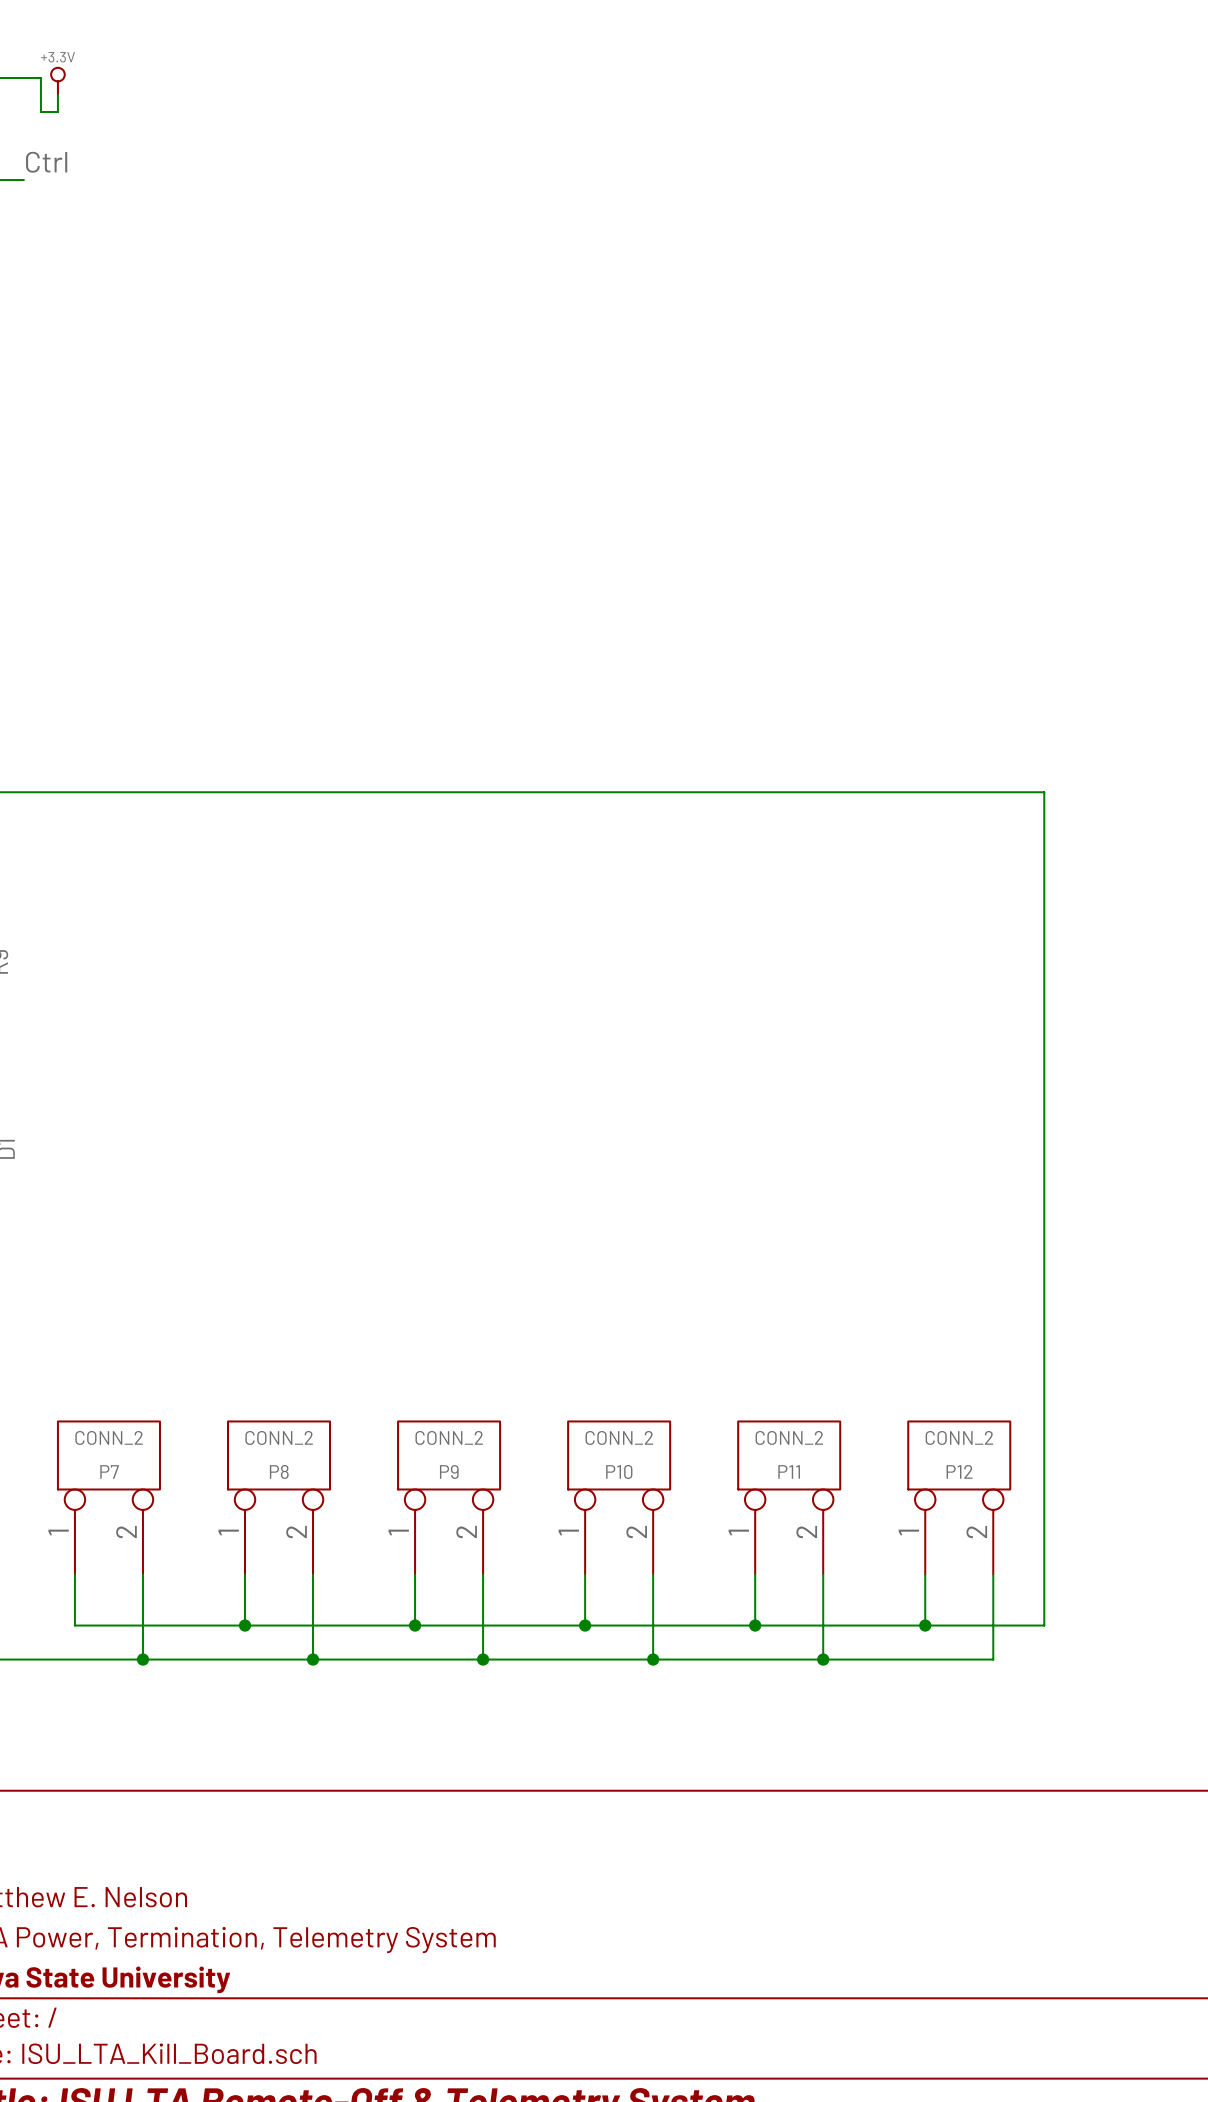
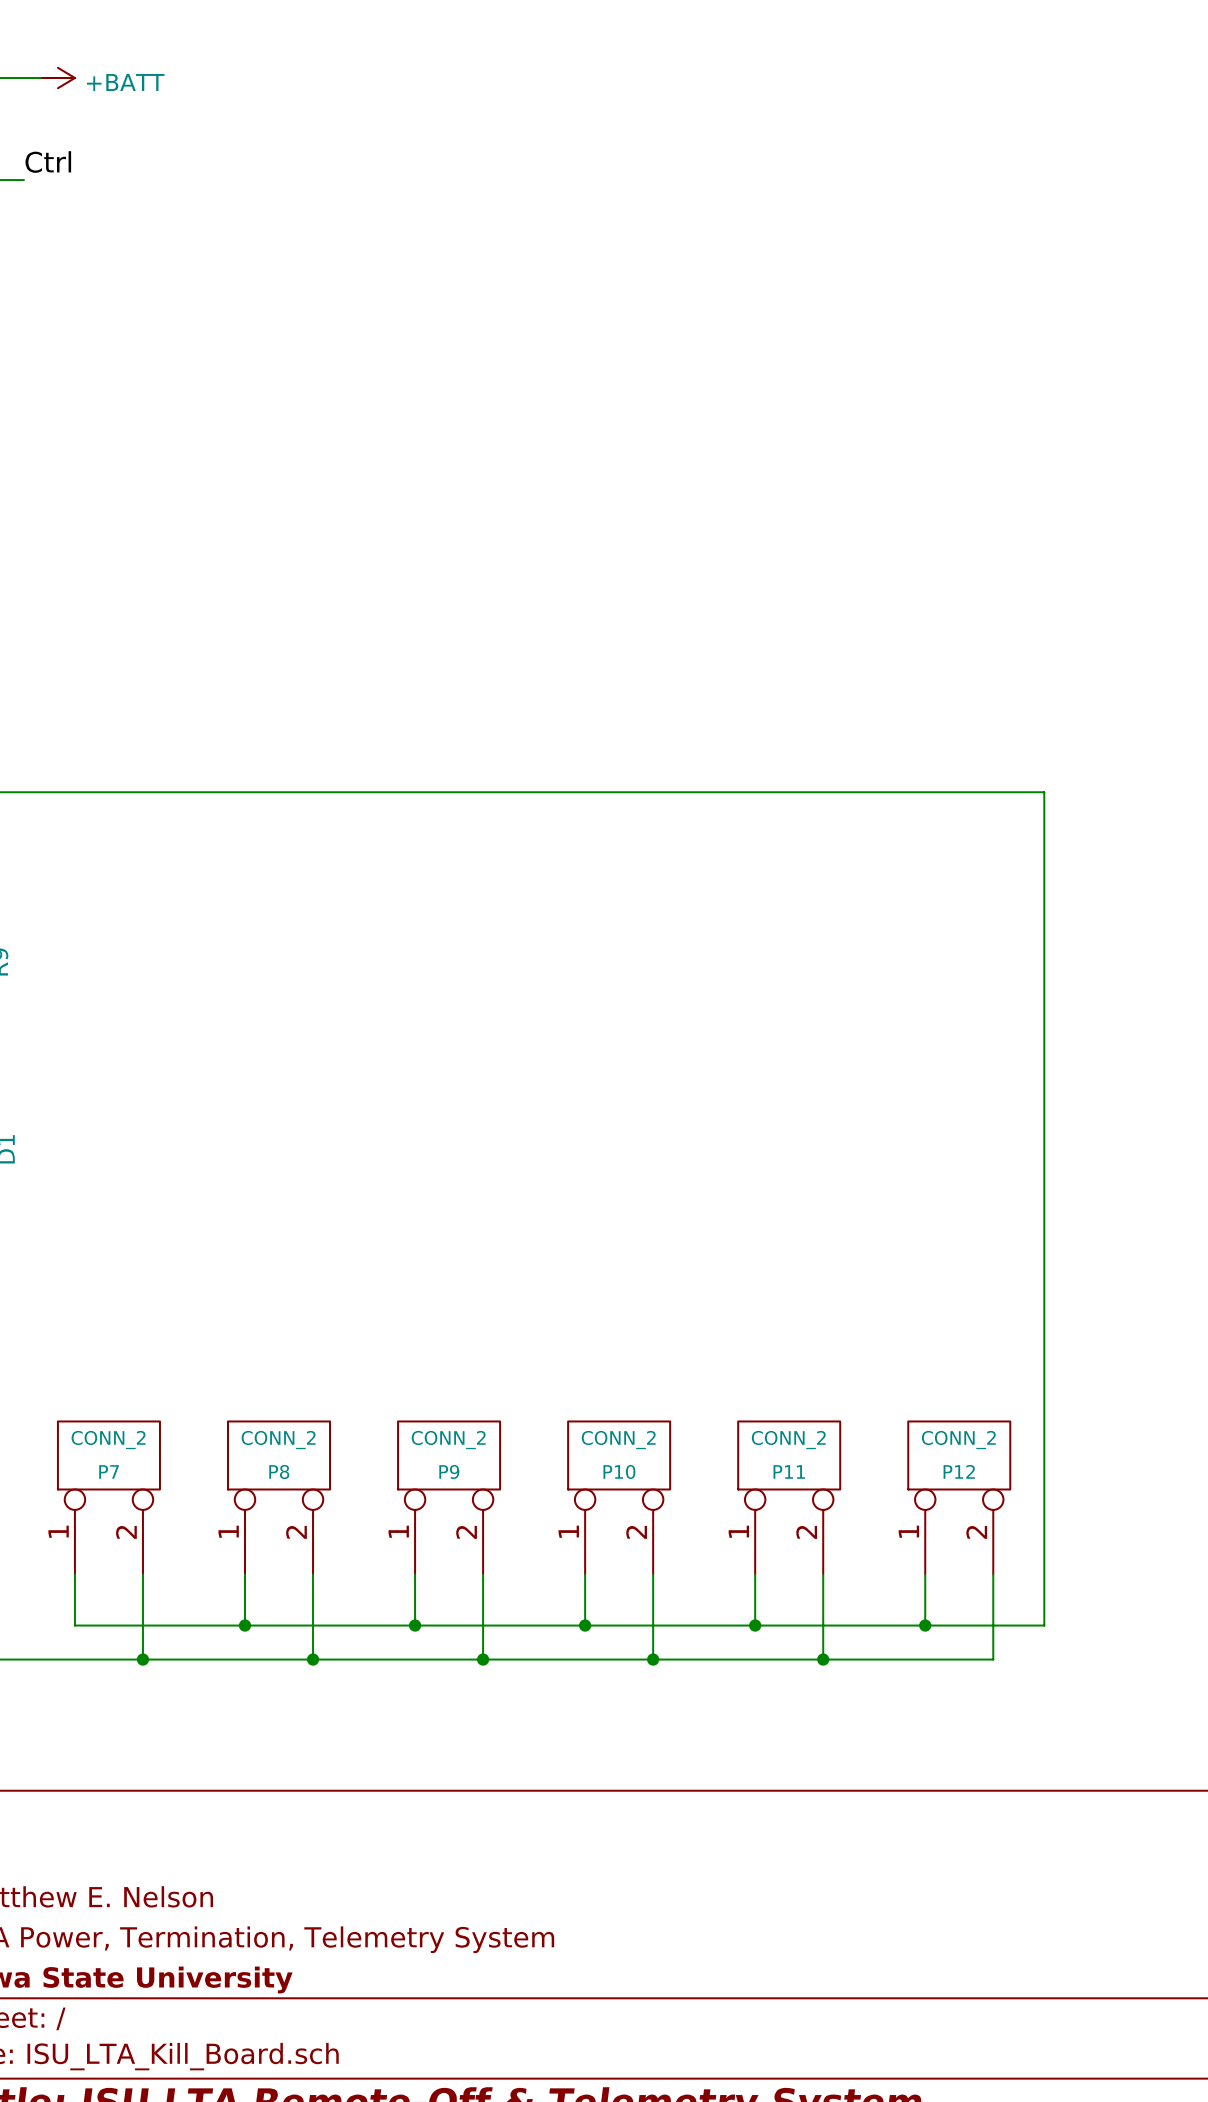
wire: (40, 78) (40, 112) (57, 112) (57, 95) -> none
power symbol: +3.3V (57, 81) -> +BATT (57, 78)

